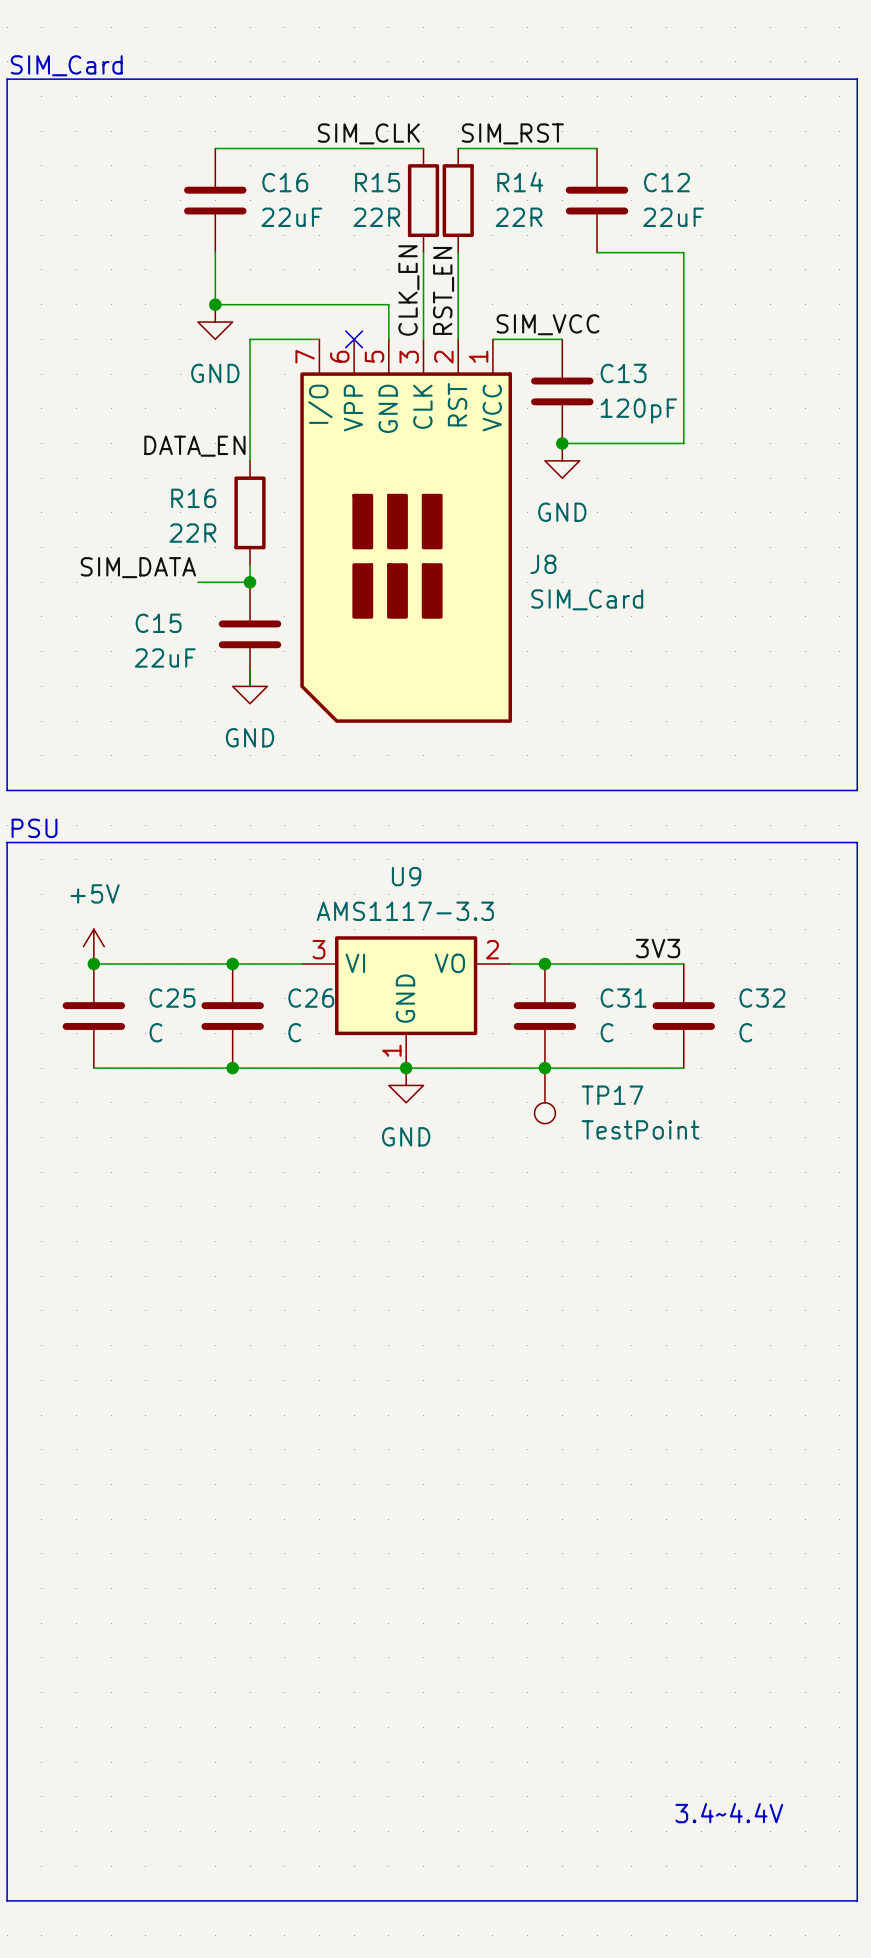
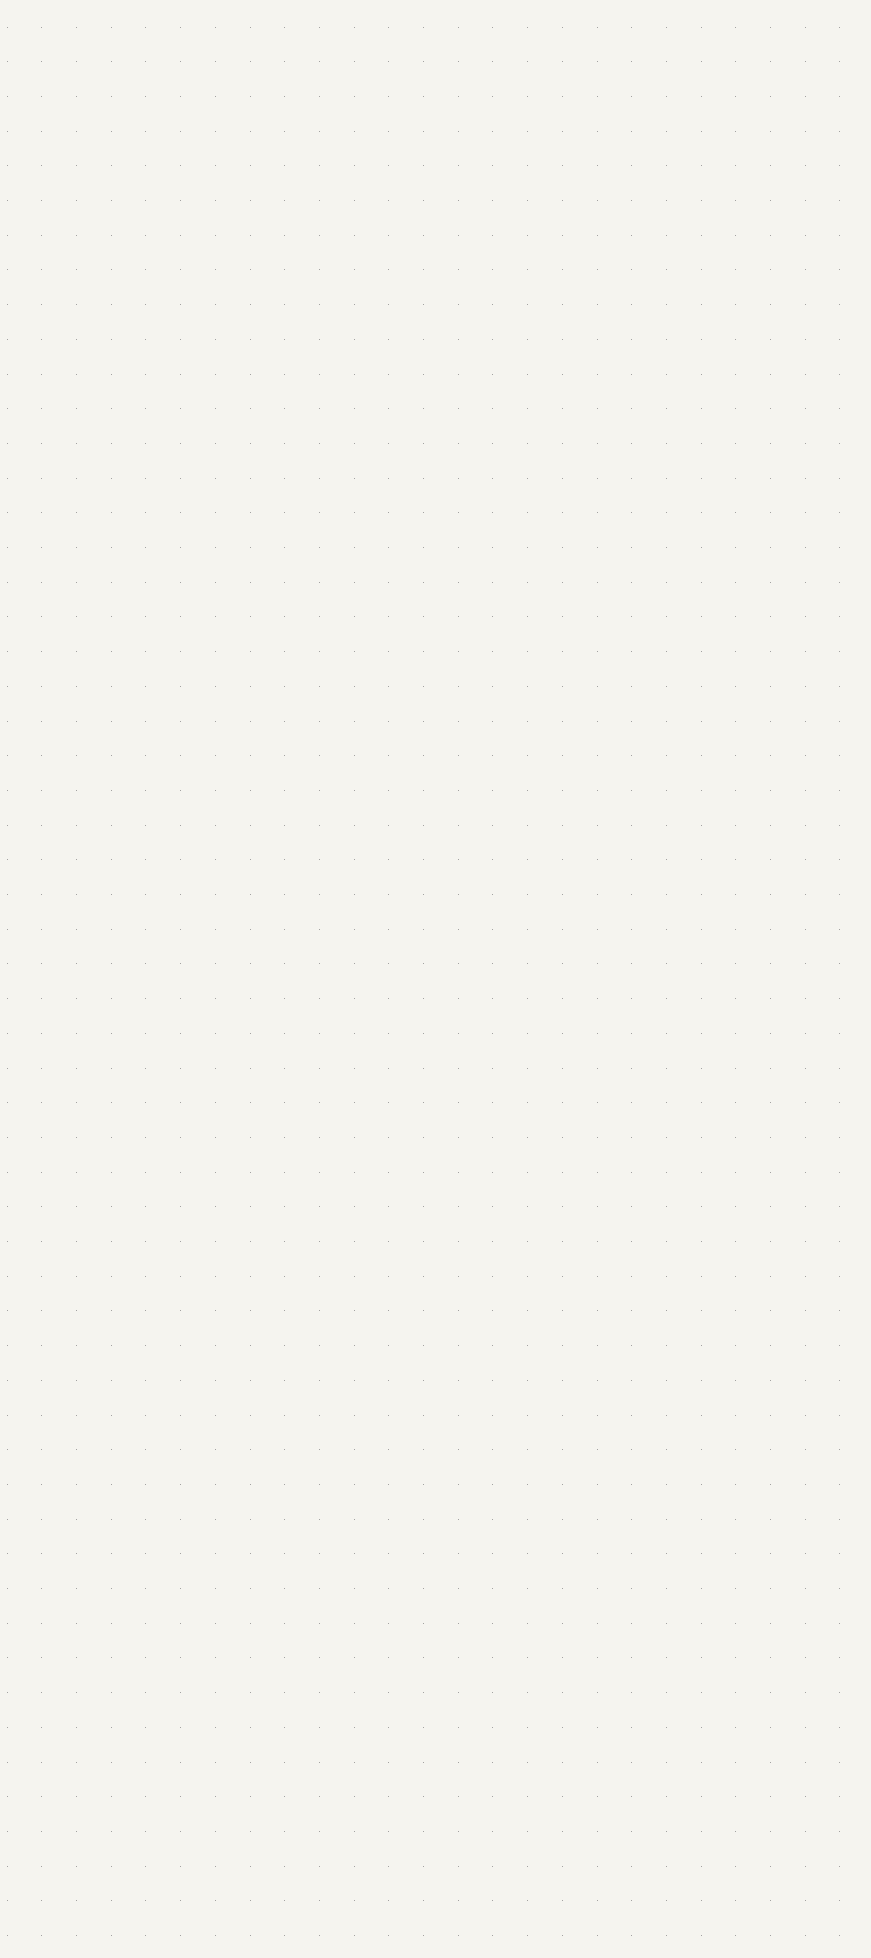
text: SIM_Card (66, 65) -> none
line: (7, 79) (857, 79) (857, 790) (7, 790) (7, 79) -> none
label: SIM_CLK (368, 133) -> none
label: SIM_RST (512, 133) -> none
wire: (215, 148) (423, 148) -> none
wire: (458, 148) (597, 148) -> none
C16: 22uF (215, 200) -> none
R15: 22R (423, 200) -> none
R14: 22R (458, 200) -> none
C12: 22uF (597, 200) -> none
wire: (215, 252) (215, 304) (388, 304) (388, 339) -> none
wire: (423, 252) (423, 339) -> none
wire: (458, 252) (458, 339) -> none
wire: (597, 252) (683, 252) (683, 443) (562, 443) -> none
label: CLK_EN (408, 290) -> none
label: RST_EN (443, 290) -> none
junction: (215, 304) -> none
power symbol: GND (215, 322) -> none
label: SIM_VCC (547, 324) -> none
wire: (319, 339) (250, 339) (250, 460) -> none
no-connect mark: (354, 339) -> none
wire: (492, 339) (562, 339) -> none
C13: 120pF (562, 391) -> none
junction: (562, 443) -> none
label: DATA_EN (194, 446) -> none
power symbol: GND (562, 460) -> none
R16: 22R (250, 512) -> none
J8: SIM_Card (406, 531) -> none
wire: (250, 564) (250, 582) (197, 582) -> none
label: SIM_DATA (138, 567) -> none
junction: (250, 582) -> none
C15: 22uF (250, 634) -> none
wire: (250, 669) (250, 686) -> none
power symbol: GND (250, 686) -> none
text: PSU (34, 828) -> none
line: (7, 842) (857, 842) (857, 1900) (7, 1900) (7, 842) -> none
power symbol: +5V (93, 946) -> none
label: 3V3 (658, 948) -> none
wire: (93, 963) (302, 963) -> none
junction: (93, 963) -> none
junction: (232, 963) -> none
wire: (510, 963) (683, 963) -> none
junction: (544, 963) -> none
U9: AMS1117-3.3 (406, 1002) -> none
C25: C (93, 1016) -> none
C26: C (232, 1016) -> none
C31: C (544, 1016) -> none
C32: C (683, 1016) -> none
wire: (93, 1068) (683, 1068) -> none
junction: (232, 1068) -> none
junction: (406, 1068) -> none
junction: (544, 1068) -> none
power symbol: GND (406, 1085) -> none
TP17: TestPoint (544, 1095) -> none
text: 3.4~4.4V (729, 1813) -> none

